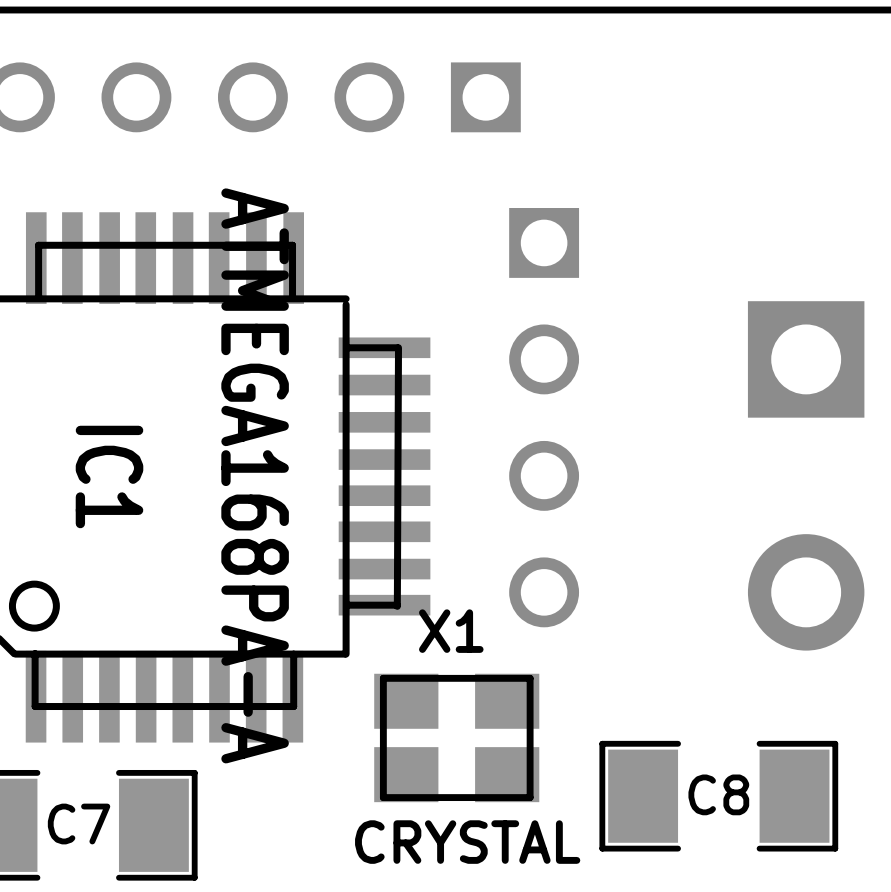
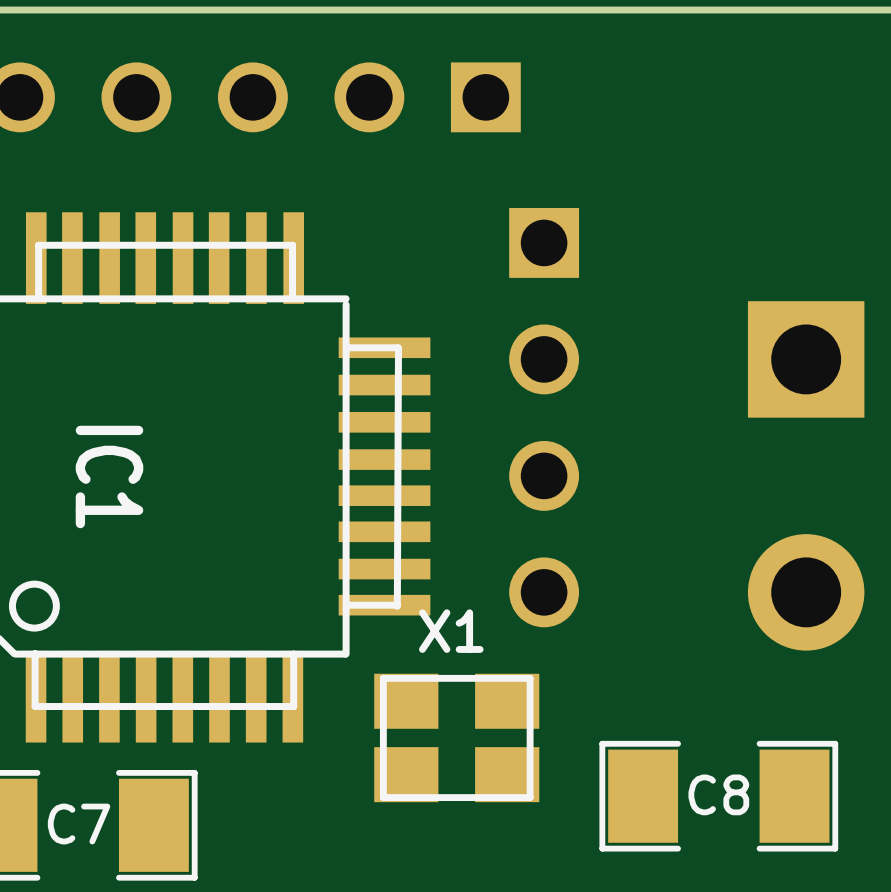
IC1 value: ATMEGA168PA-A (255, 475) -> none
X1 value: CRYSTAL (467, 842) -> none

